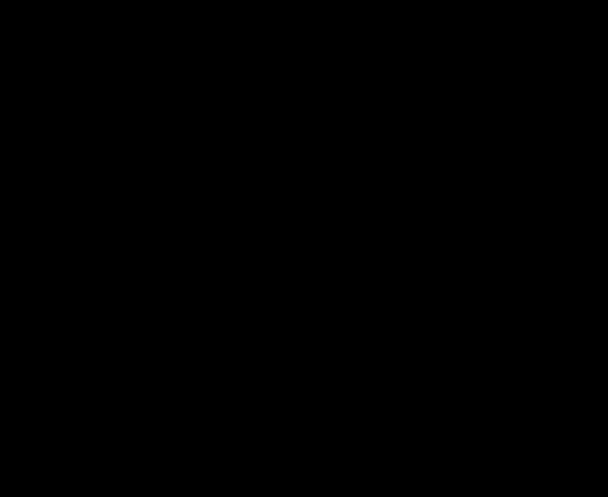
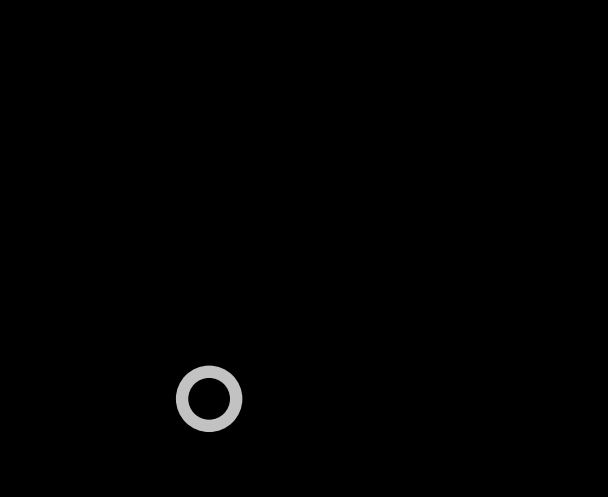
via: none -> (209, 398)

